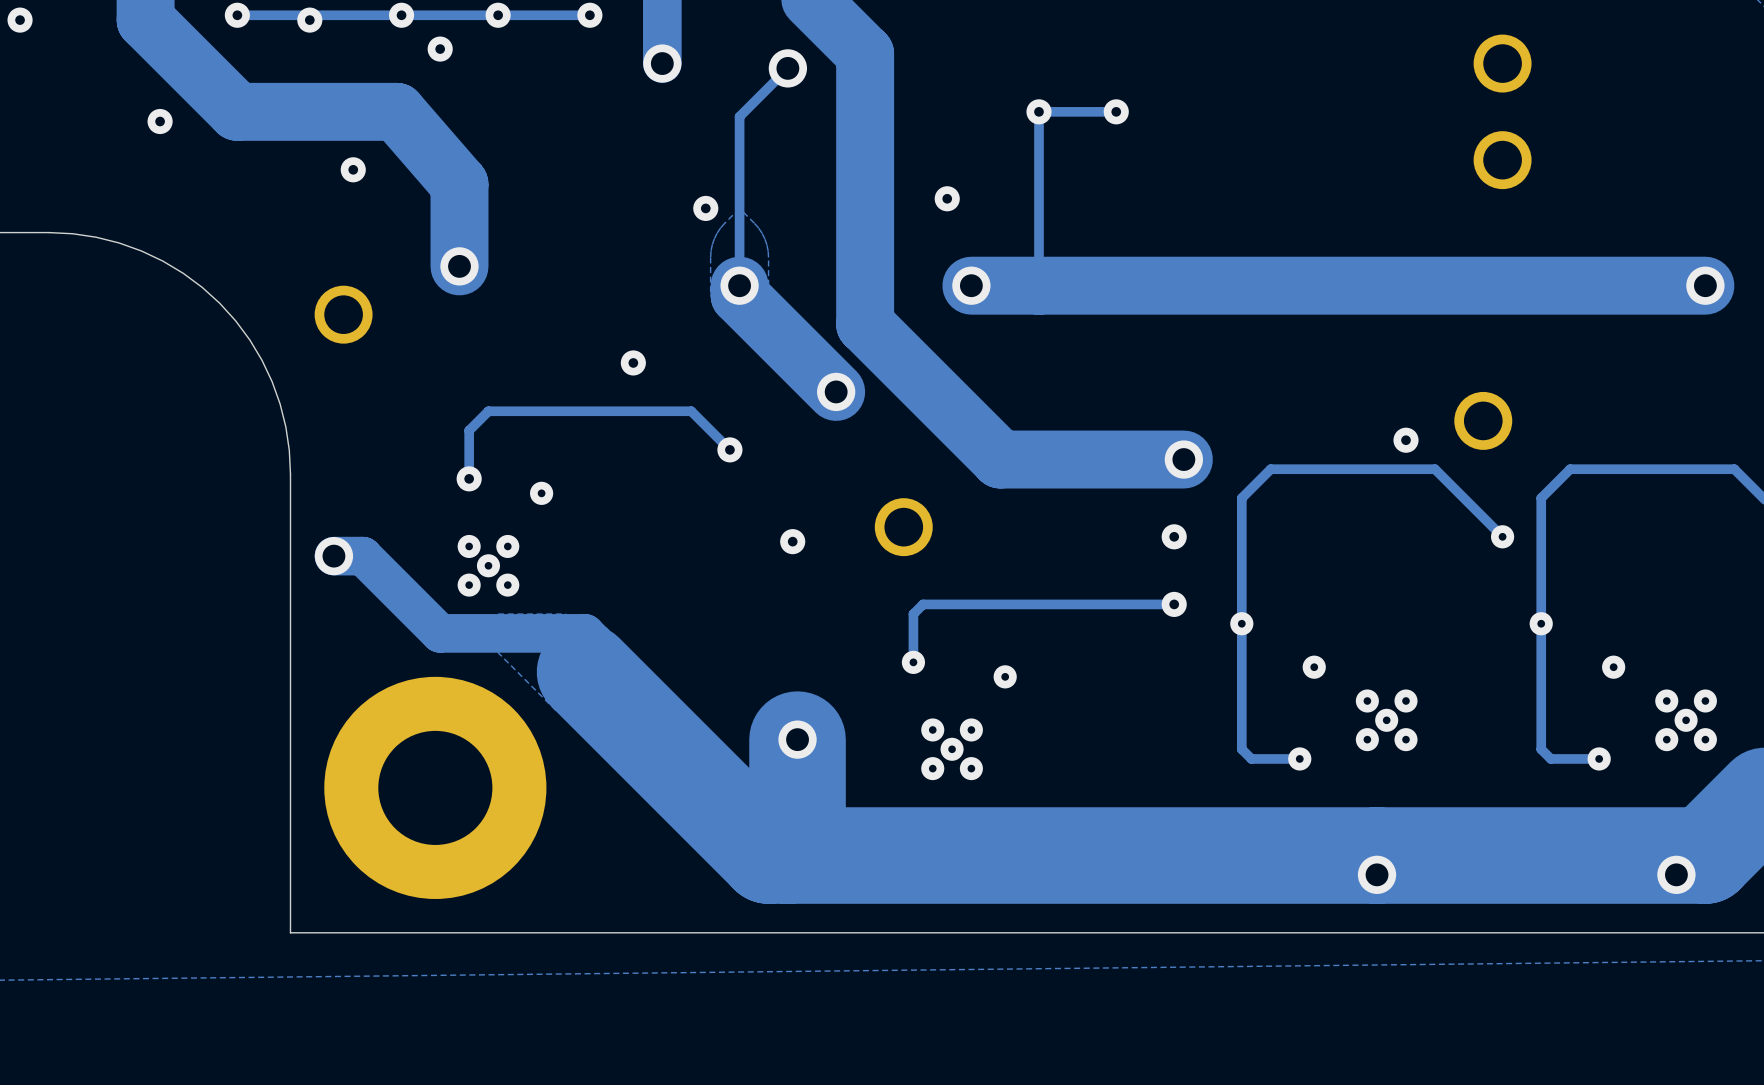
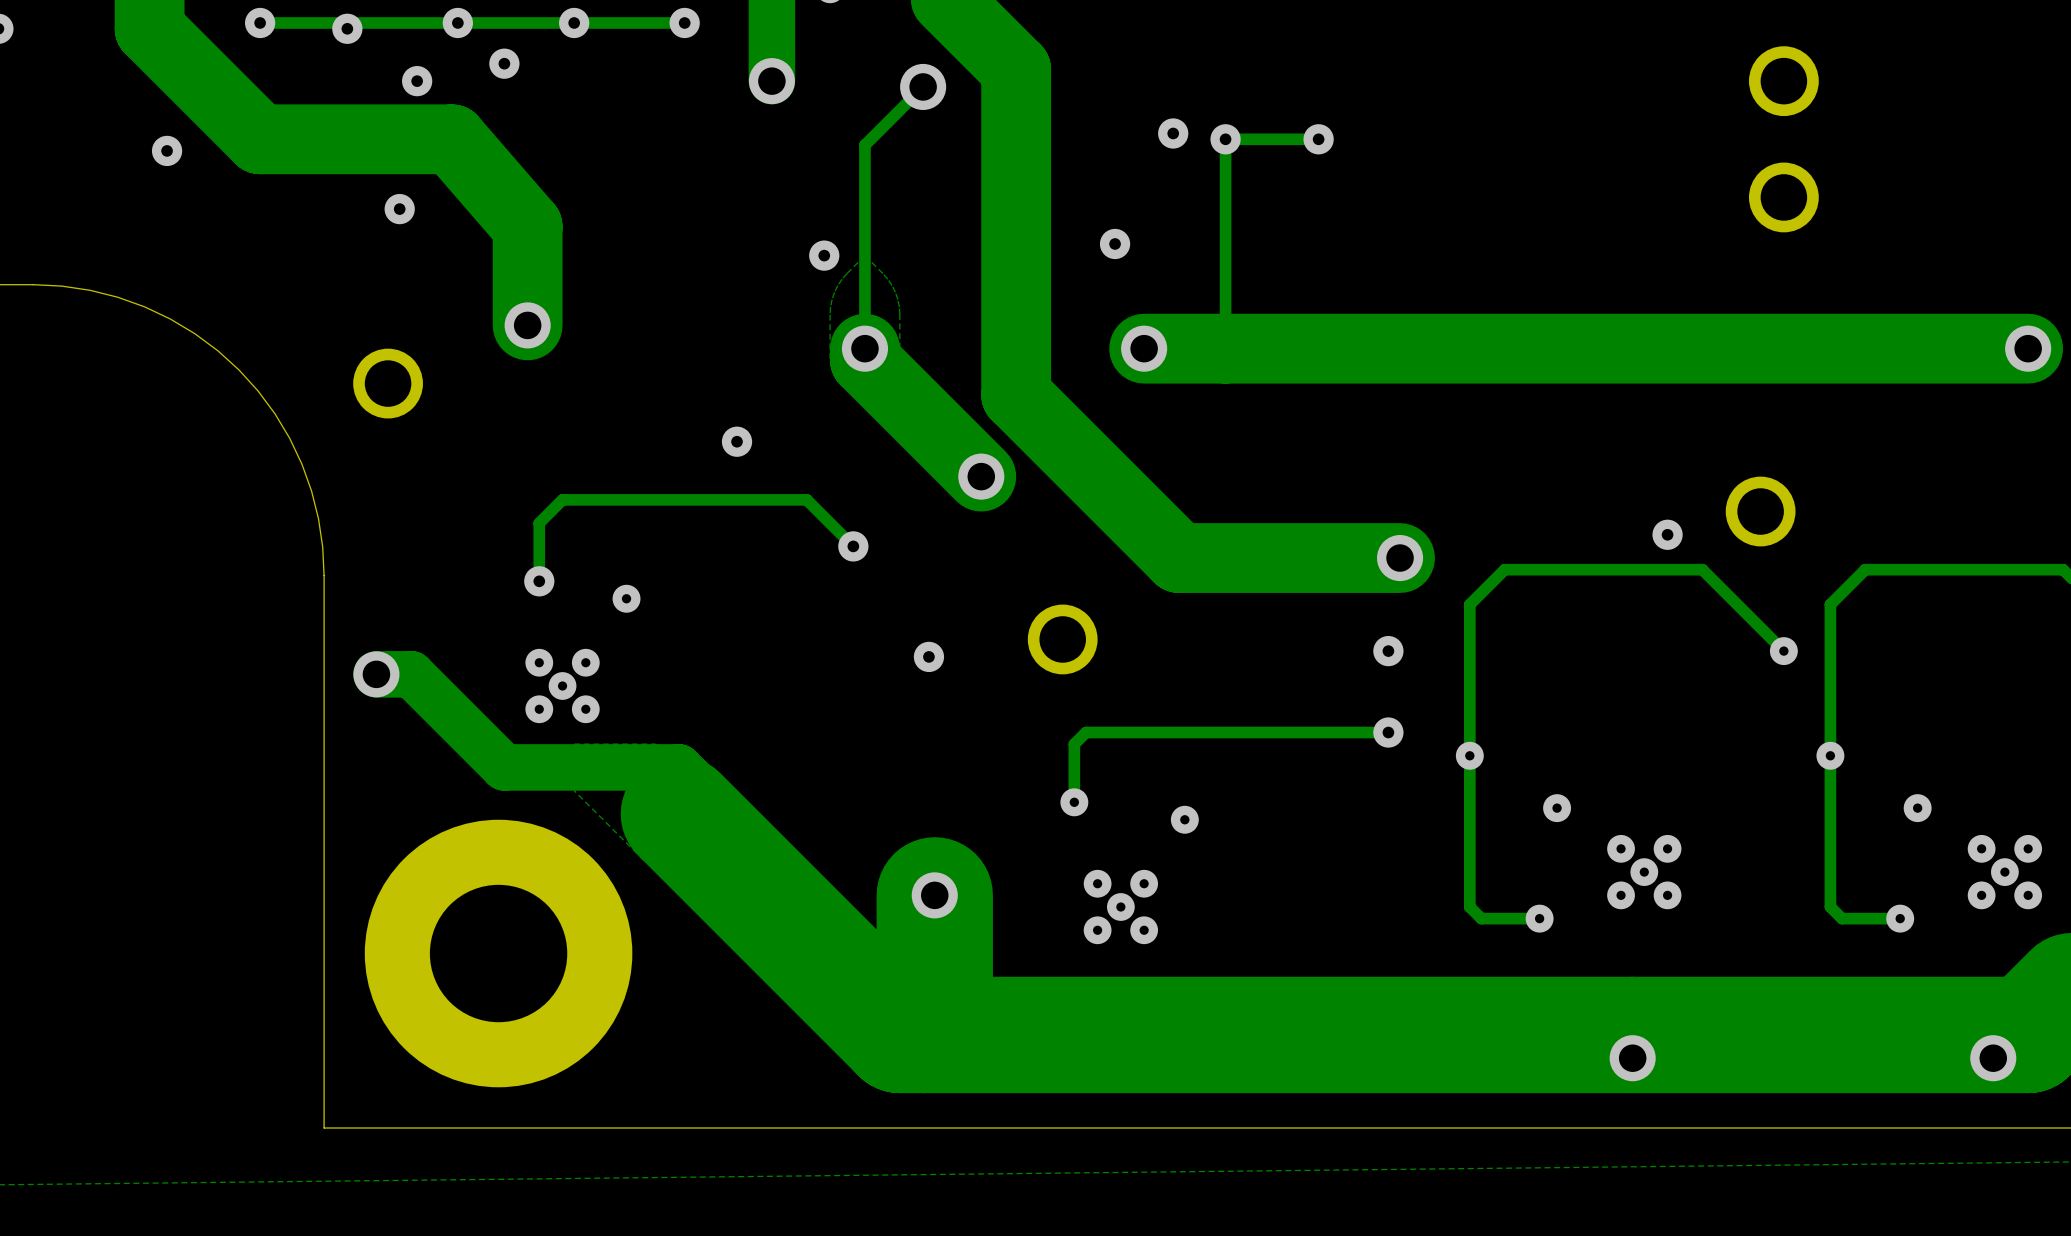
via: none -> (417, 81)
via: none -> (1173, 133)

